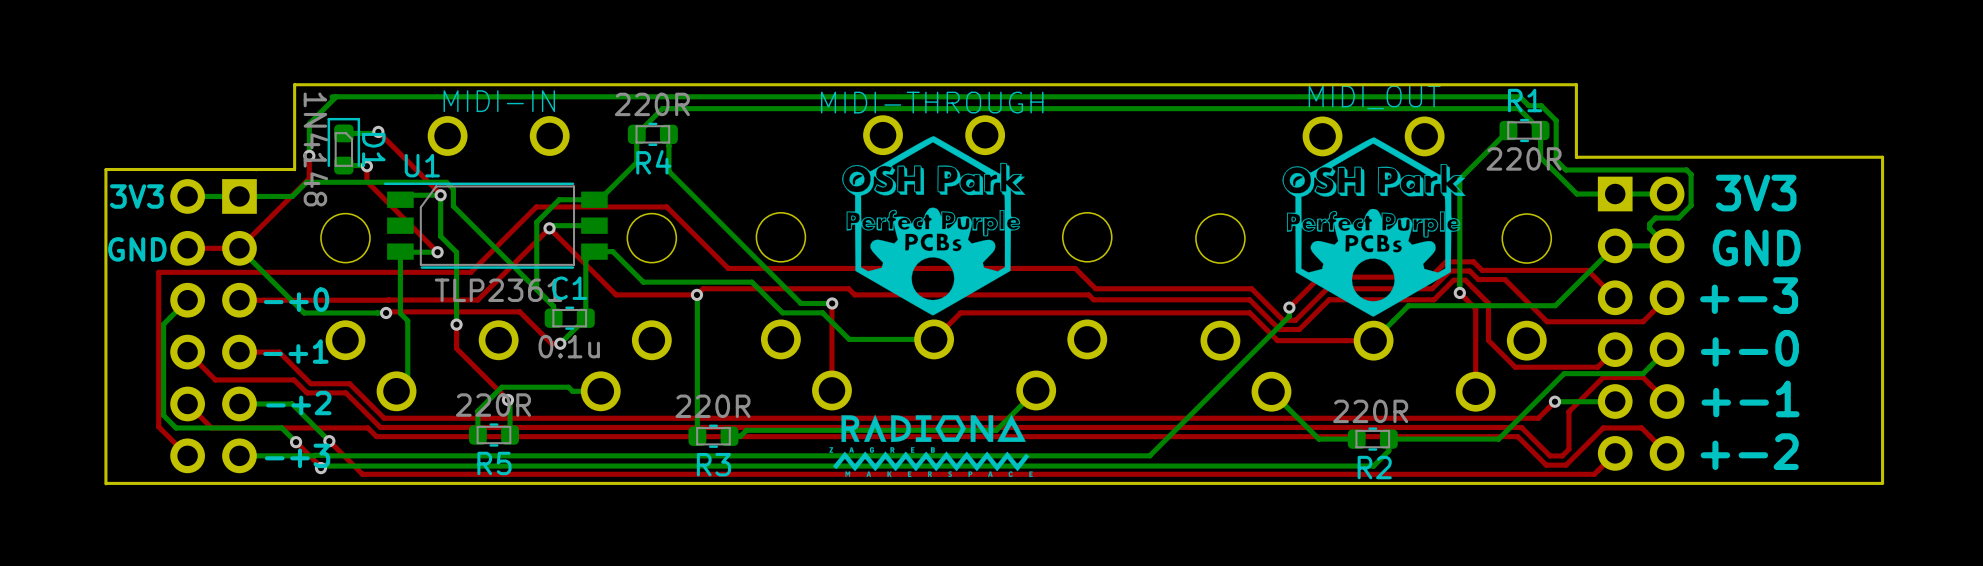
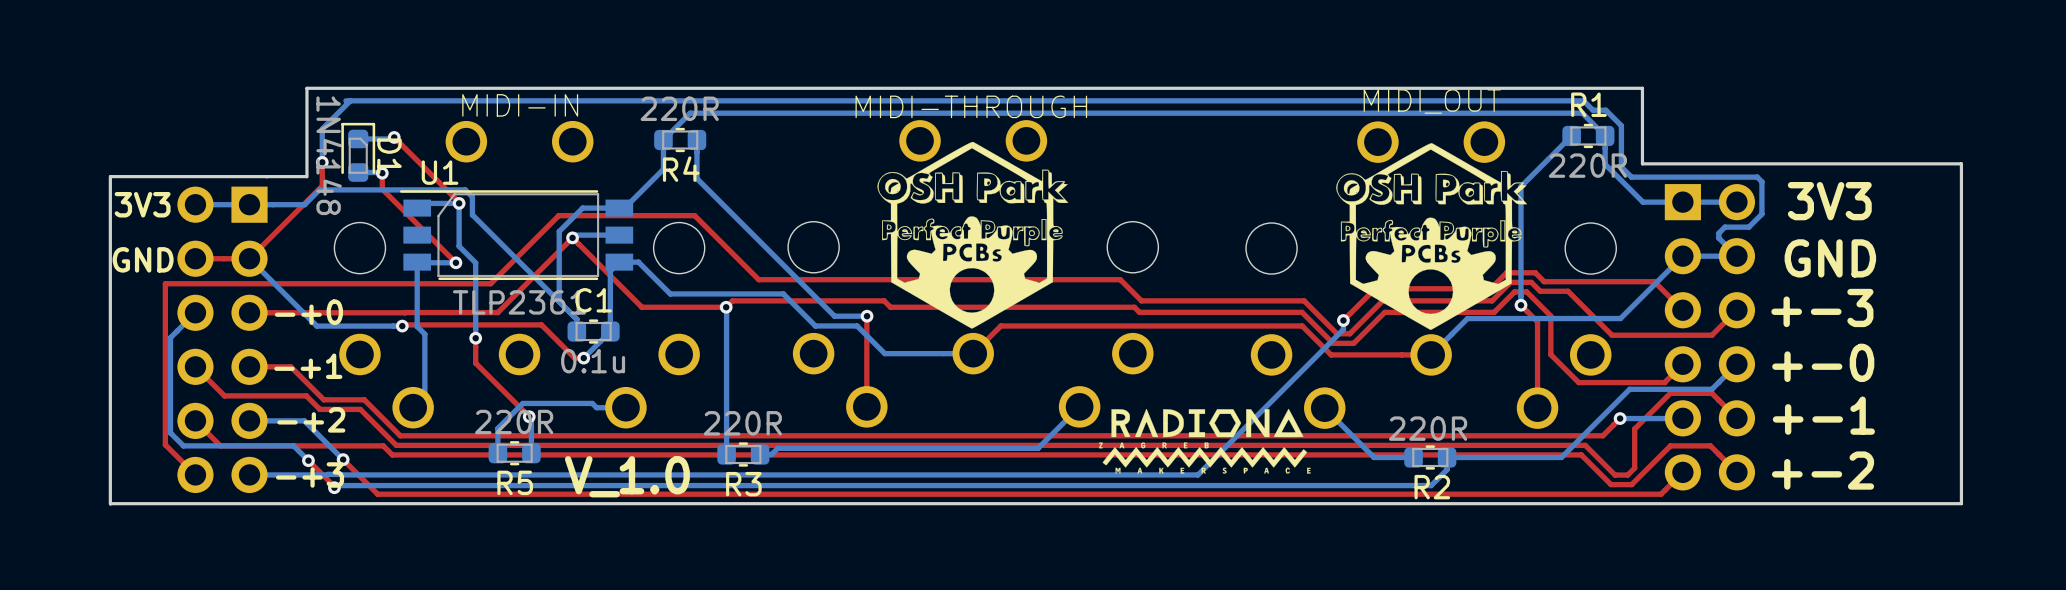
drawing position: (931, 445) -> (1204, 441)
text: none -> V_1.0 (627, 476)

